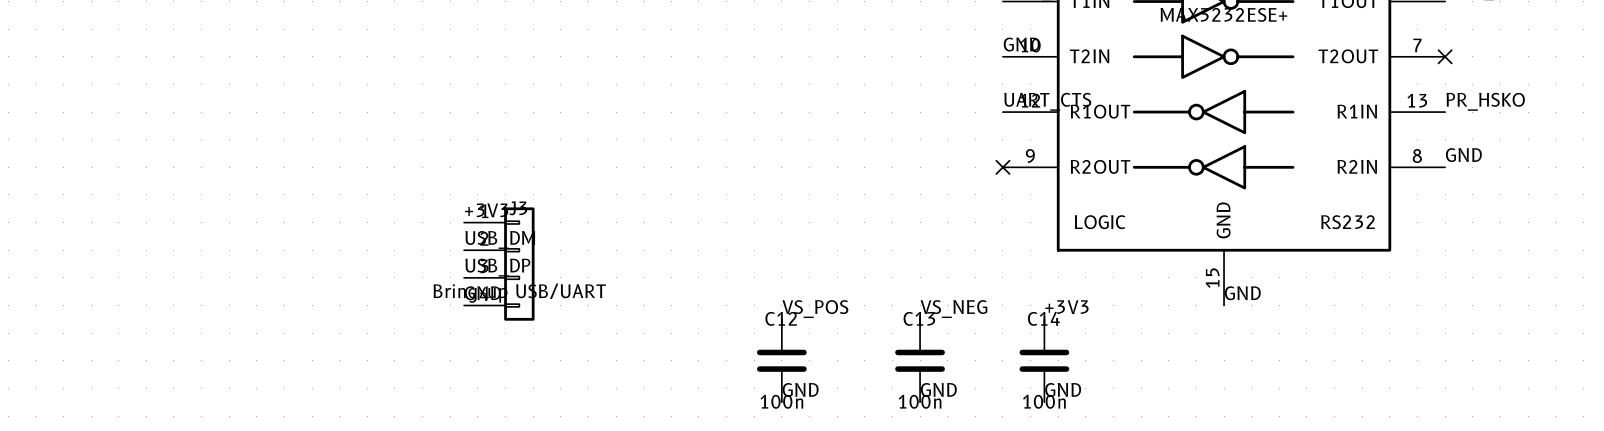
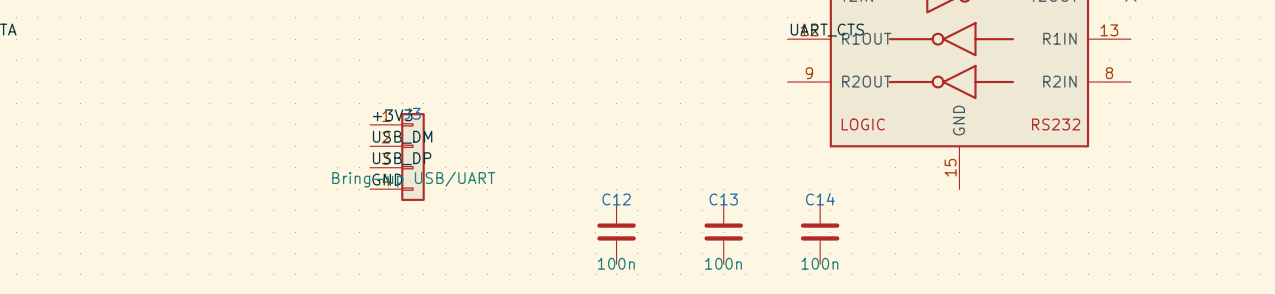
label: PR_HSKO (1485, 101) -> none
label: GND (1463, 155) -> none
no-connect mark: (1002, 167) -> none
label: GND (1242, 293) -> none
label: +3V3 (1066, 307) -> none
label: VS_POS (815, 309) -> none
label: VS_NEG (953, 309) -> none
label: GND (800, 389) -> none
label: GND (938, 389) -> none
label: GND (1063, 389) -> none

